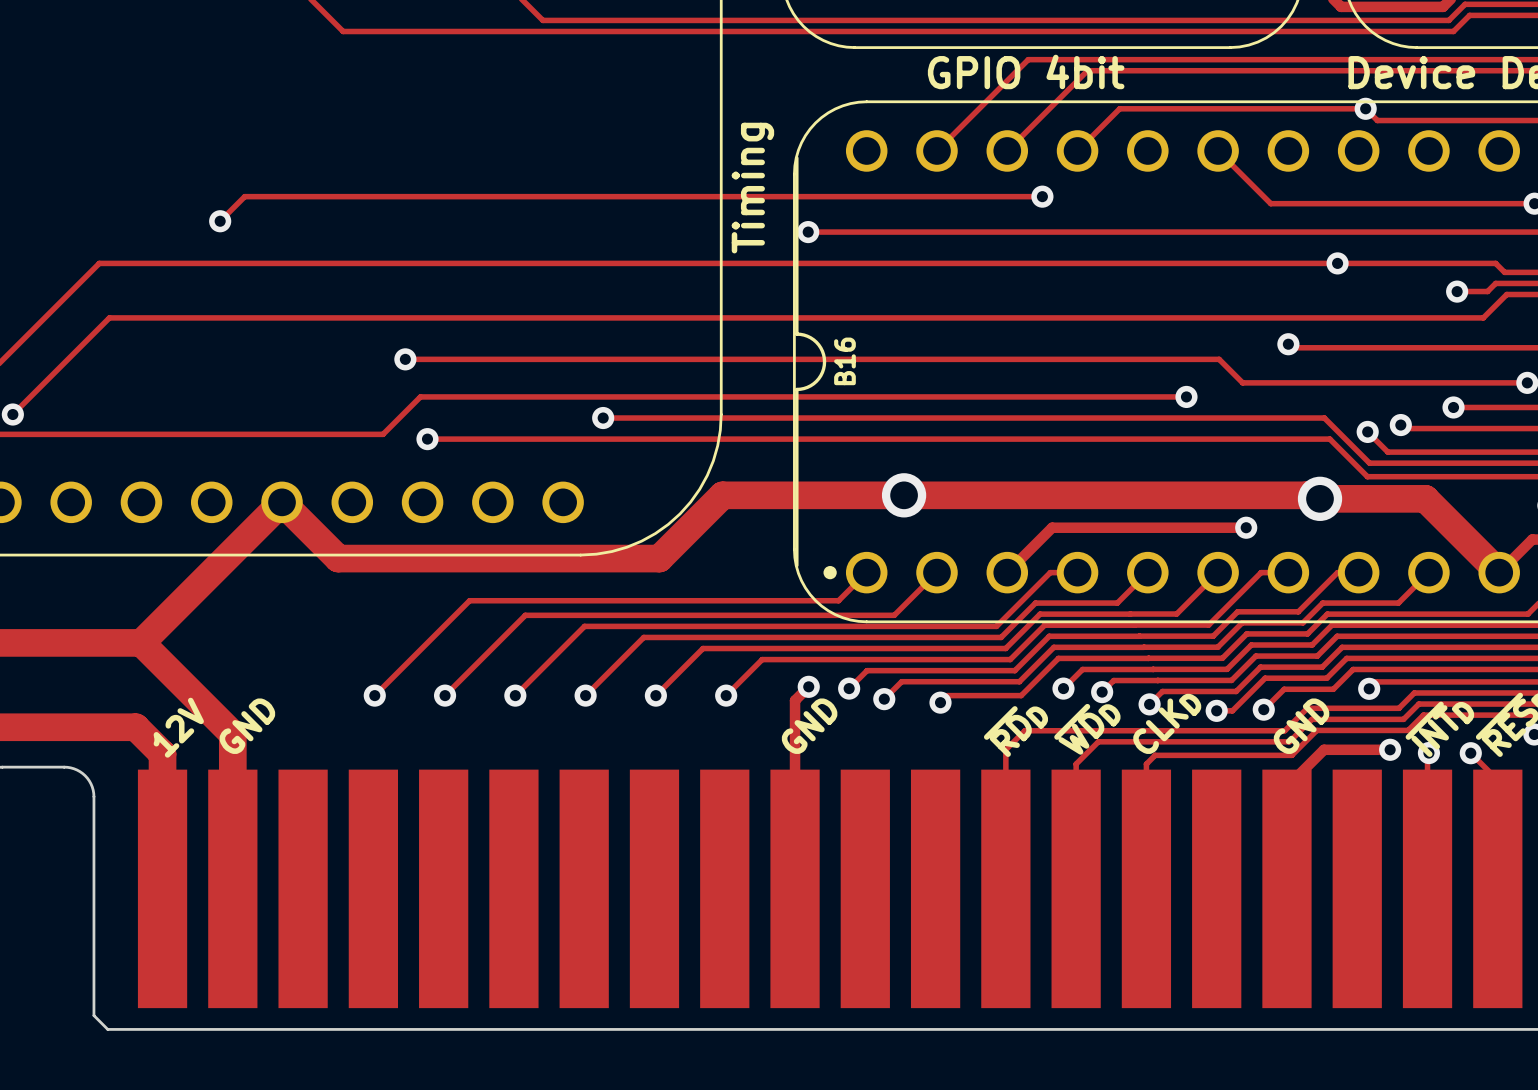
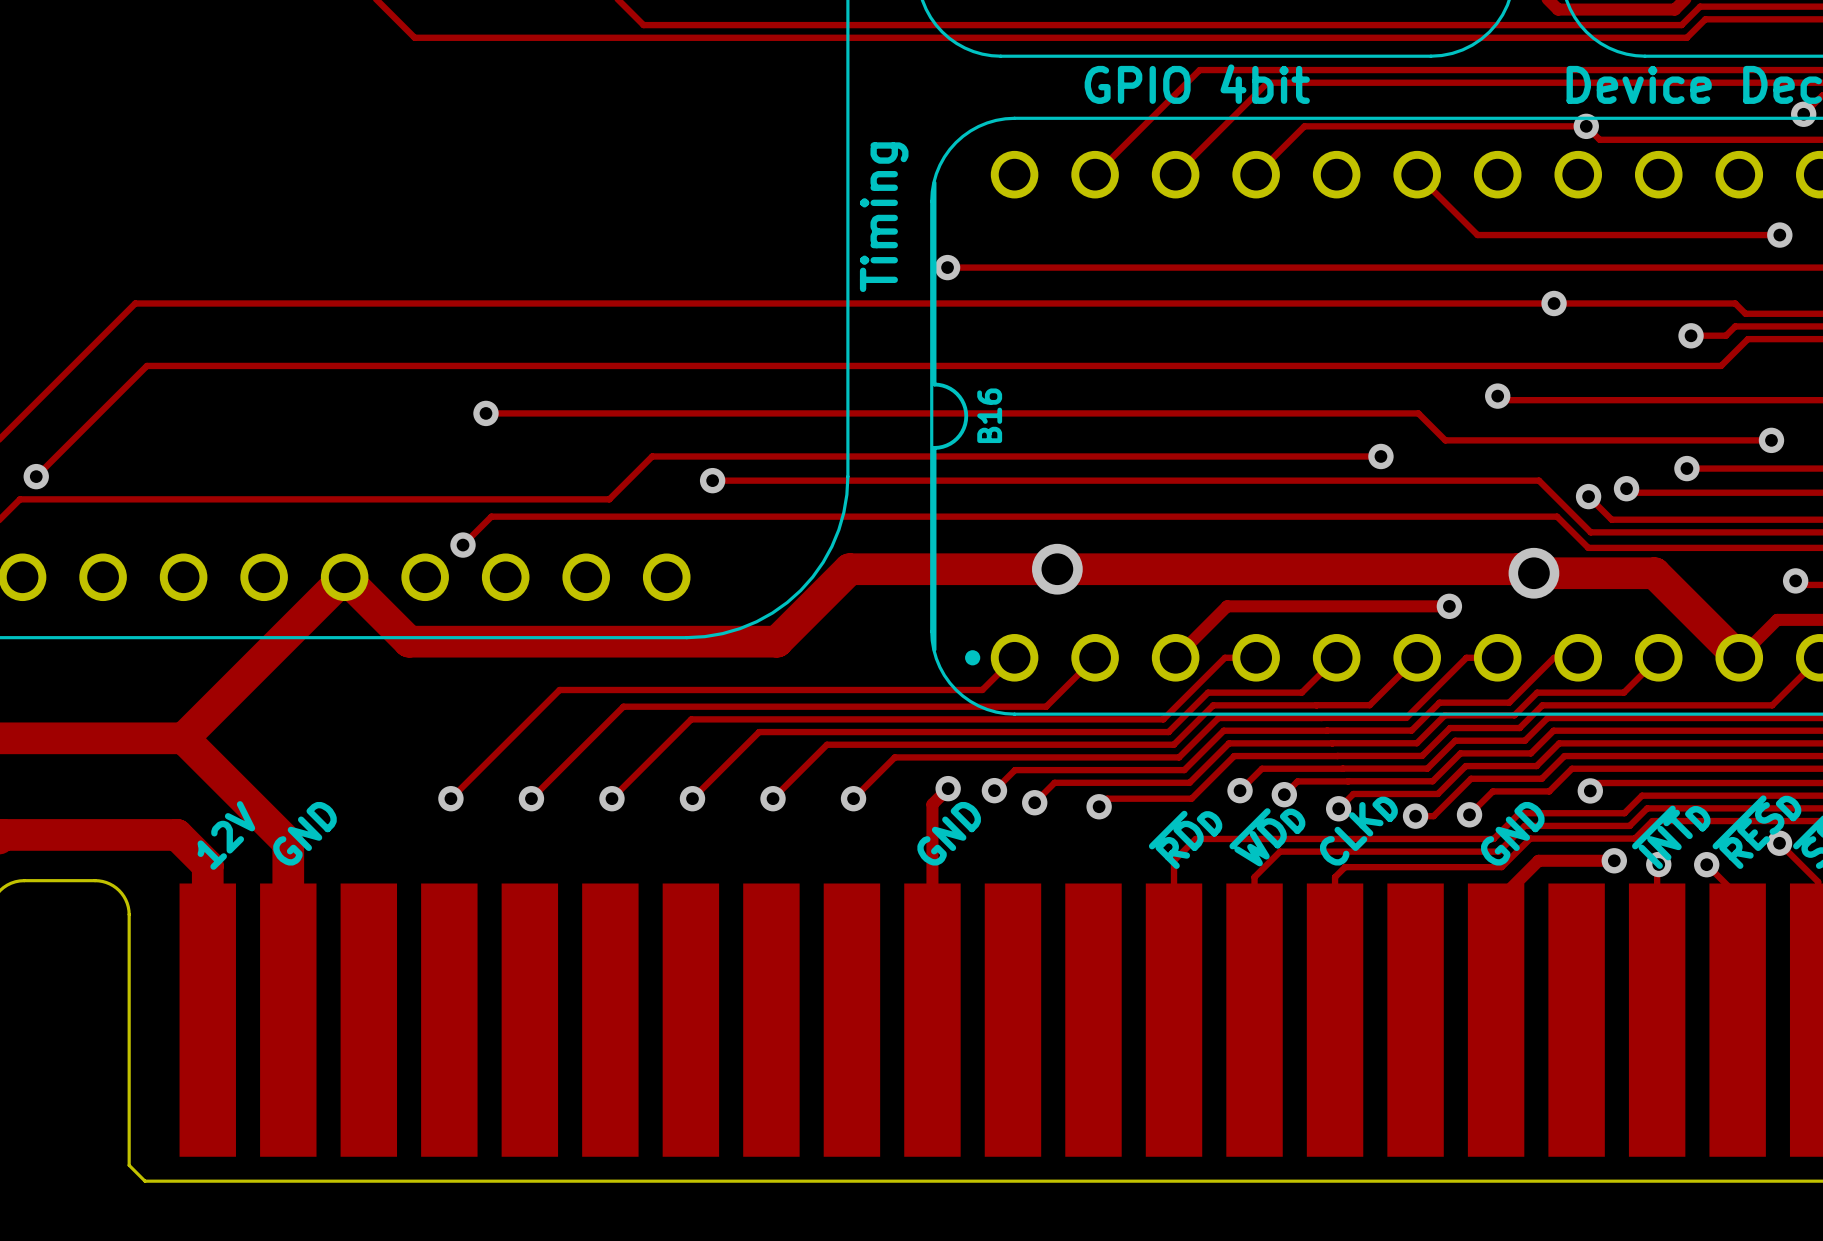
track: (1042, 196) (244, 196) (220, 221) -> none
via: (1042, 196) -> none
via: (220, 221) -> none
track: (550, 396) (420, 396) (383, 434) -> (652, 456) (609, 499) (460, 499)
track: (427, 439) (1329, 439) (1340, 449) -> (463, 545) (491, 516) (1557, 516)
via position: (427, 439) -> (463, 545)

